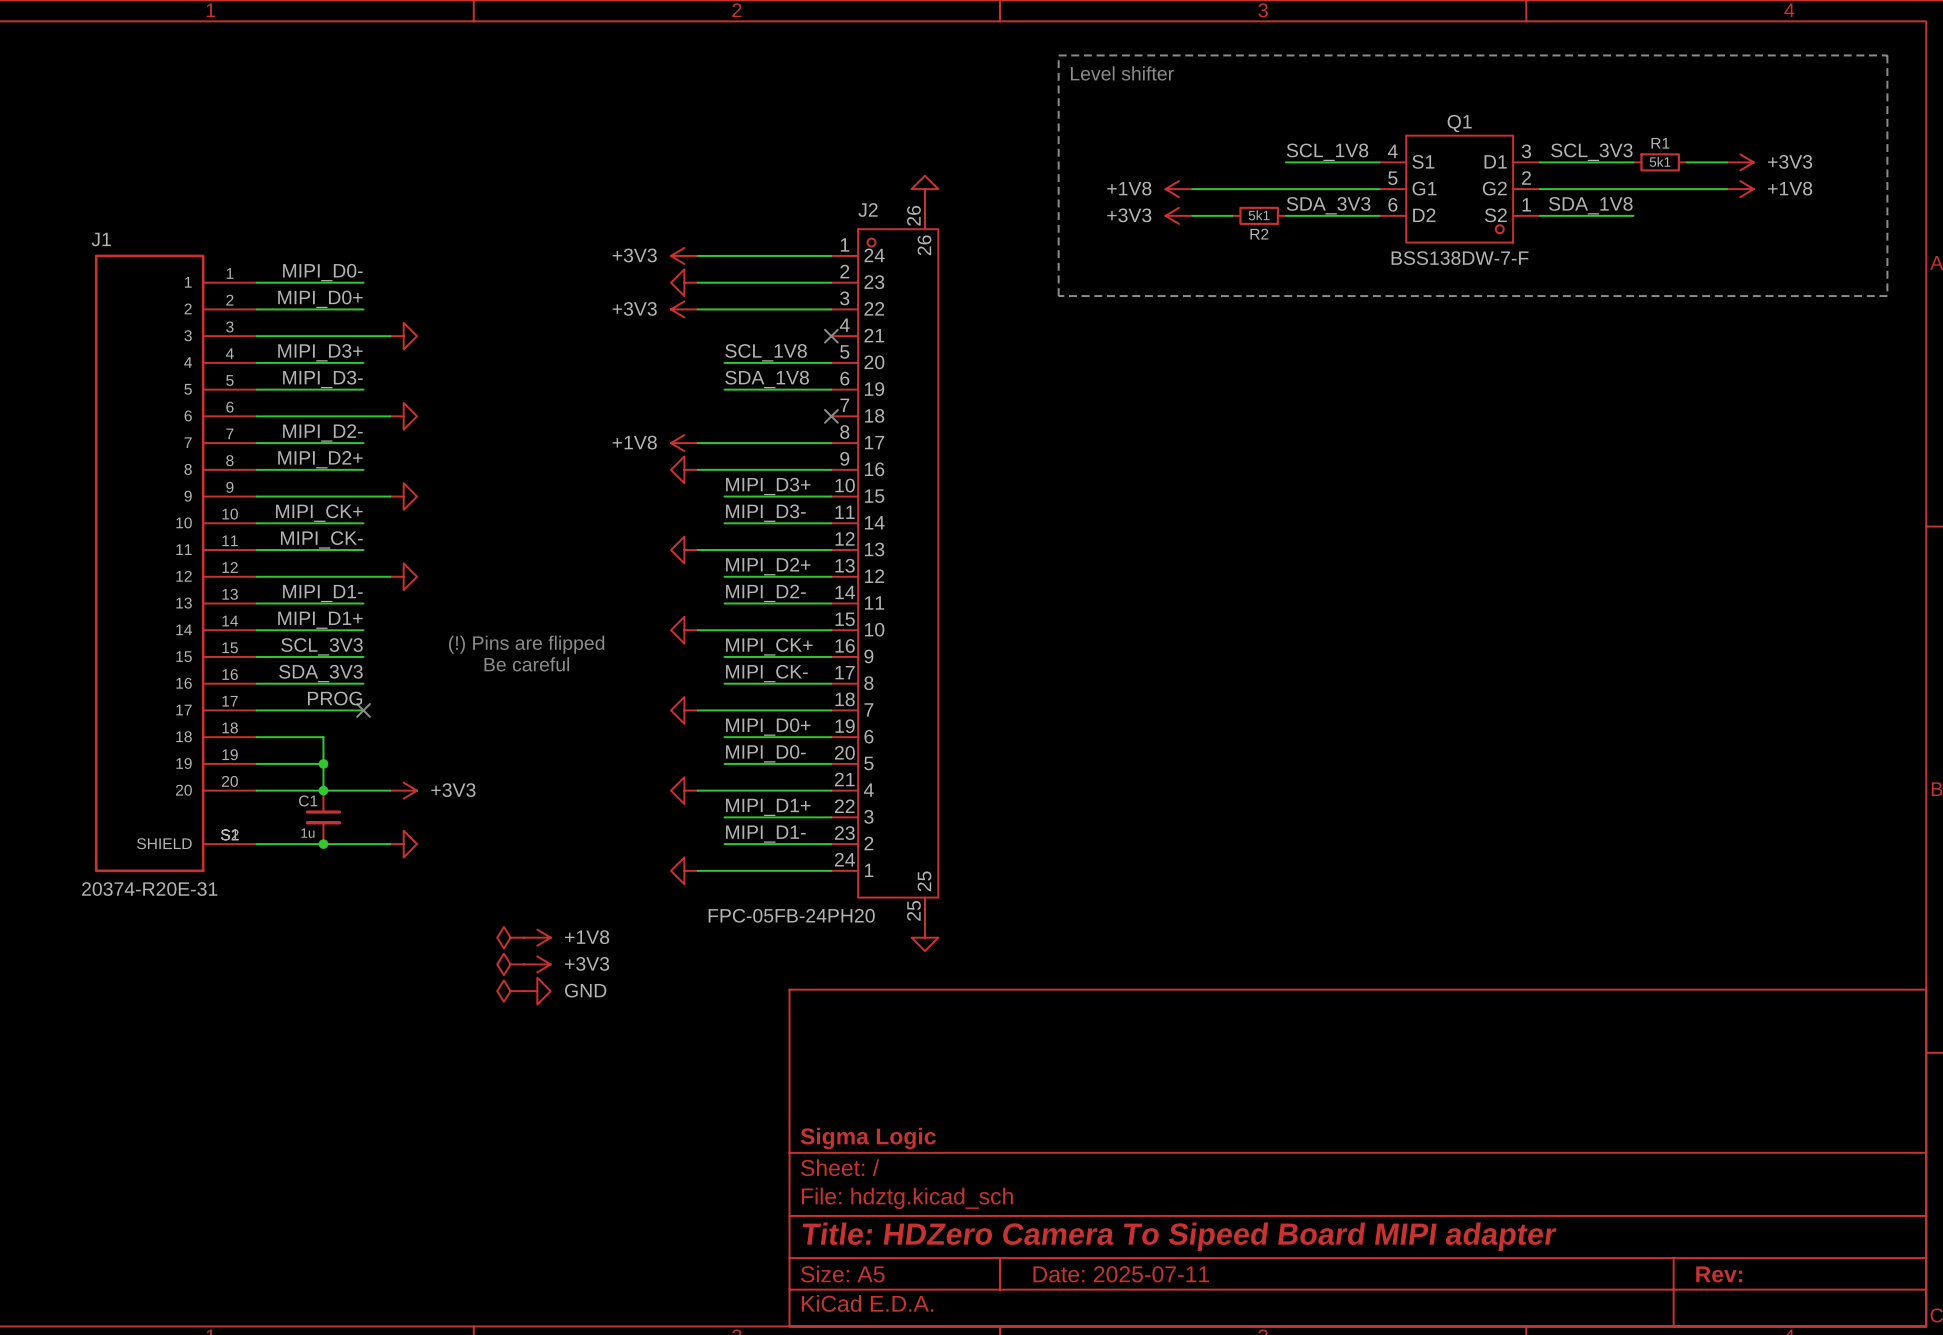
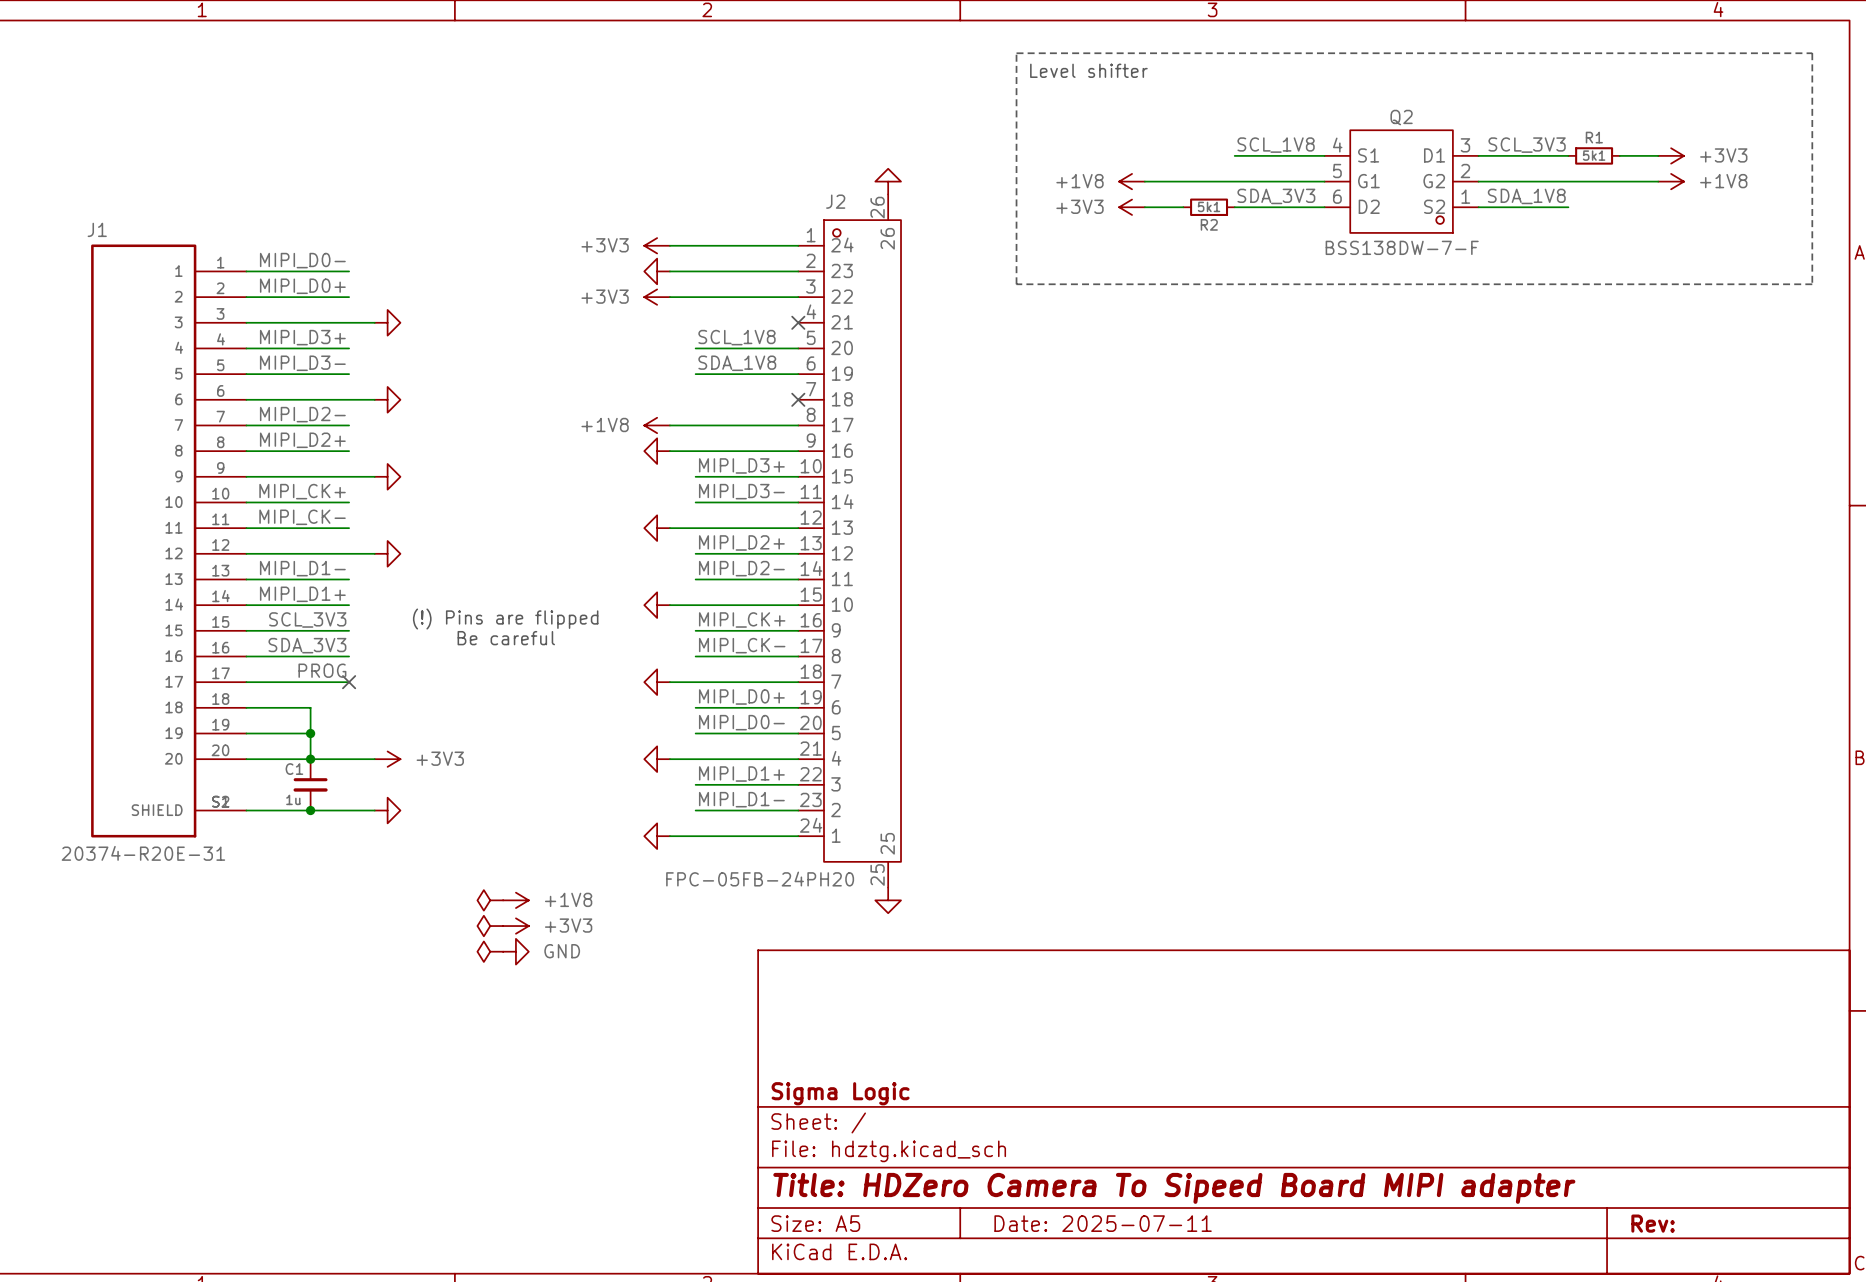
Q1 name: Q1 (1459, 123) -> Q2 (1401, 117)

